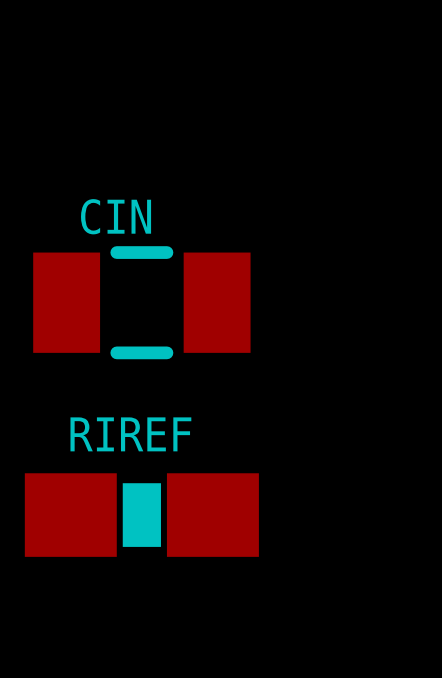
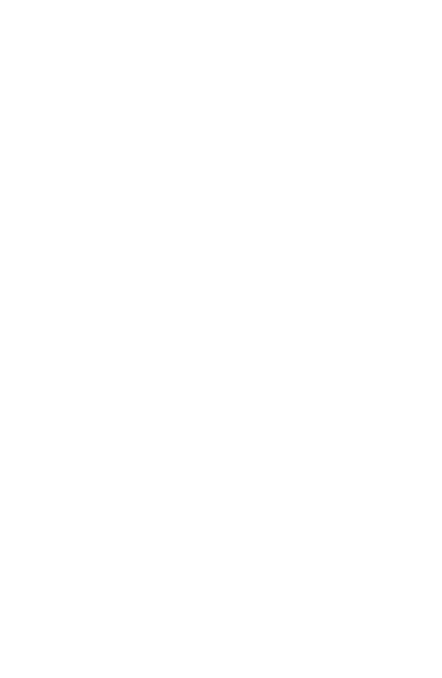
CIN: (141, 302) -> none
RIREF: (141, 515) -> none

